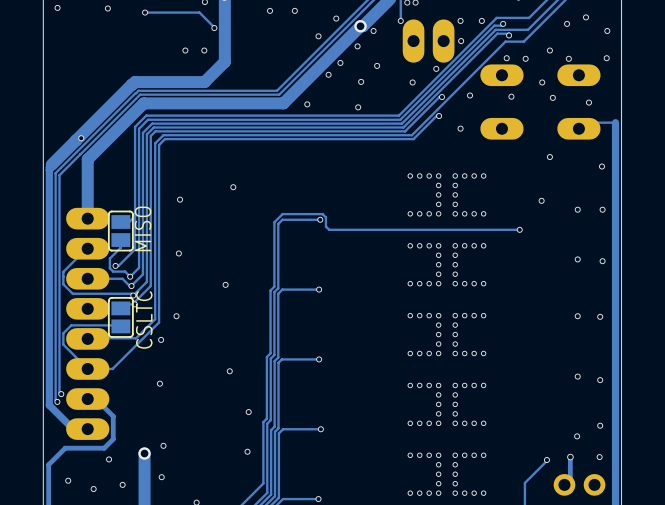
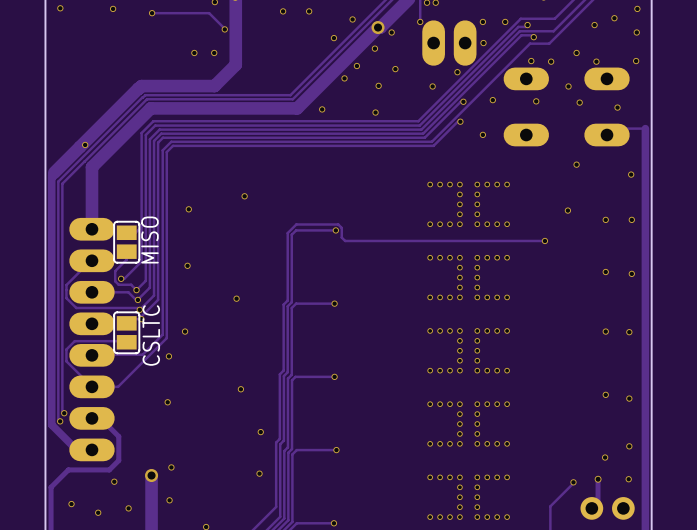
via: none -> (637, 8)

